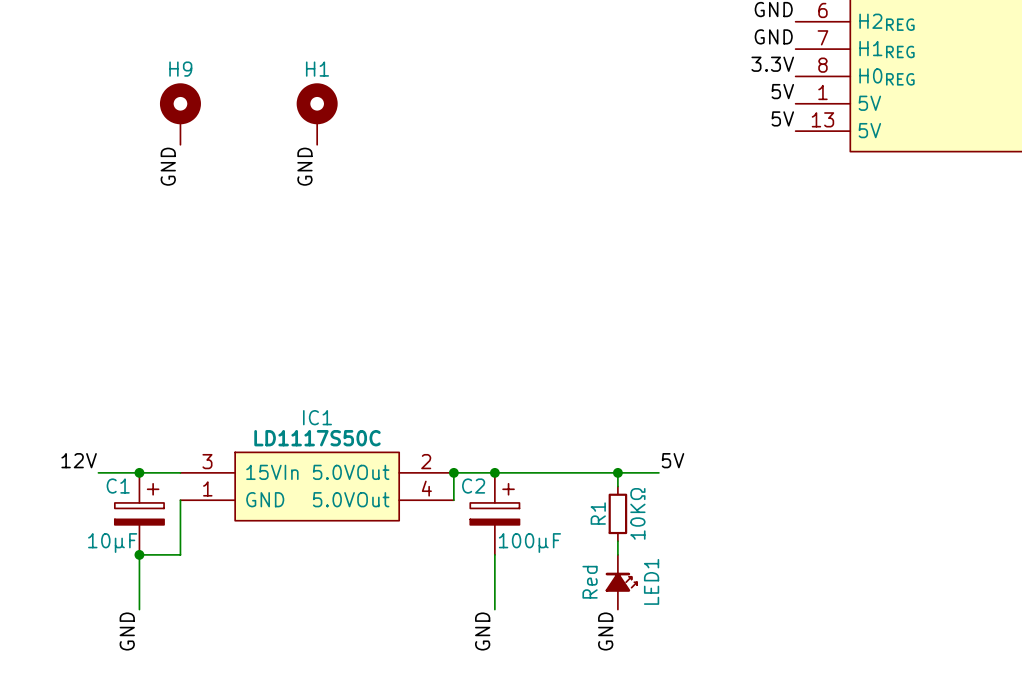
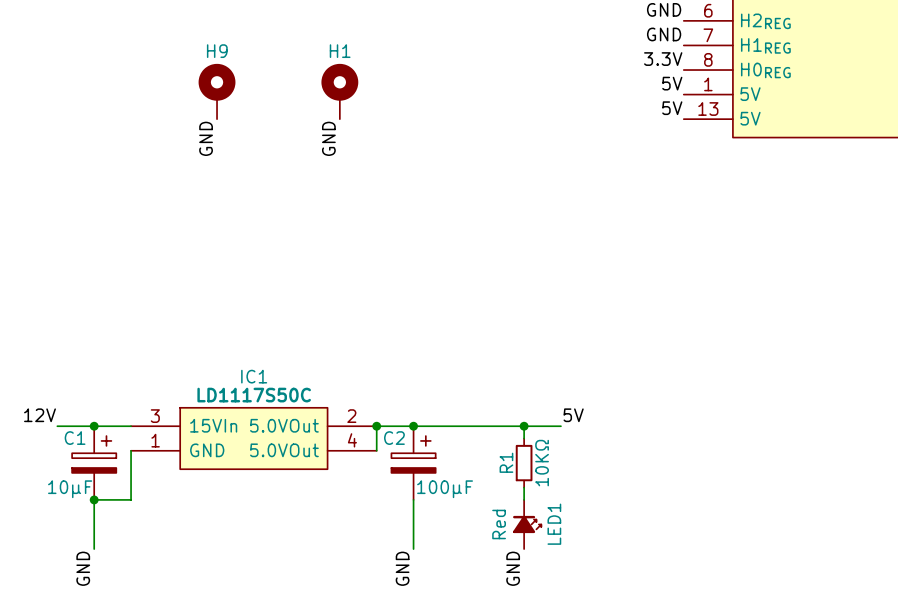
H9 position: (180, 114) -> (217, 91)
H1 position: (317, 114) -> (339, 91)
label: none -> GND (328, 138)
label: GND (168, 166) -> none
label position: GND (304, 166) -> GND (206, 138)

